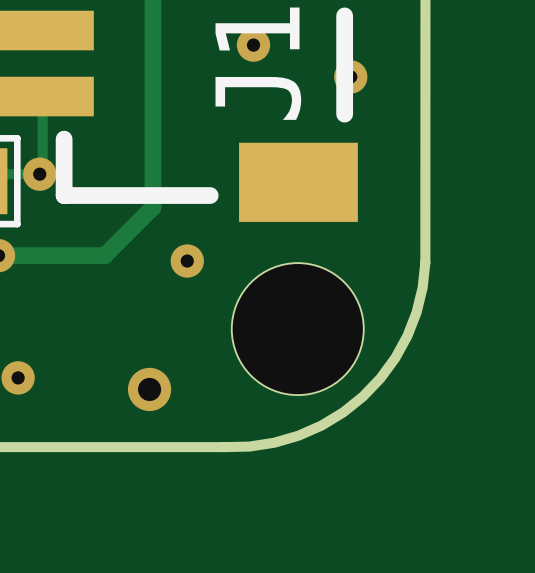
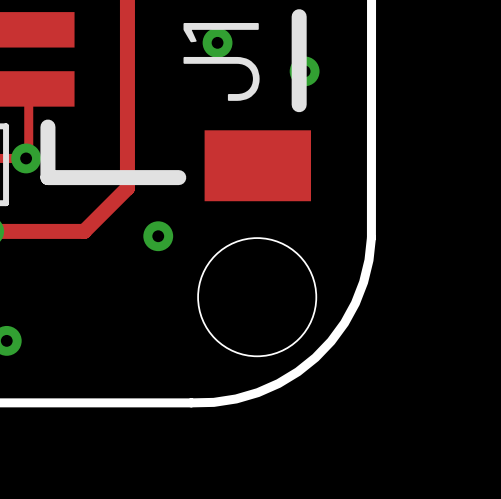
via: (149, 389) -> none

